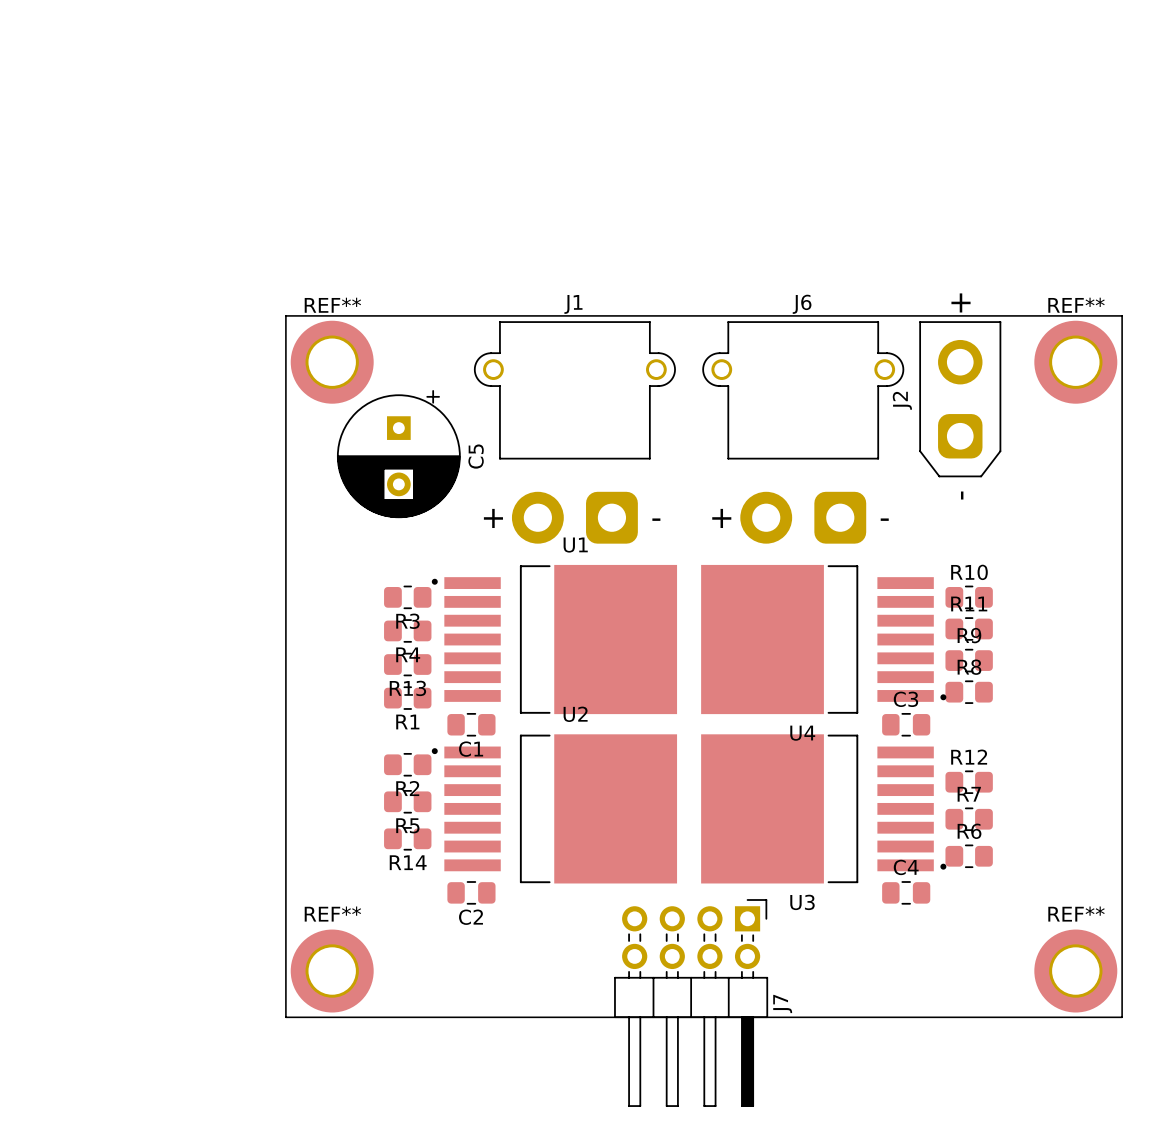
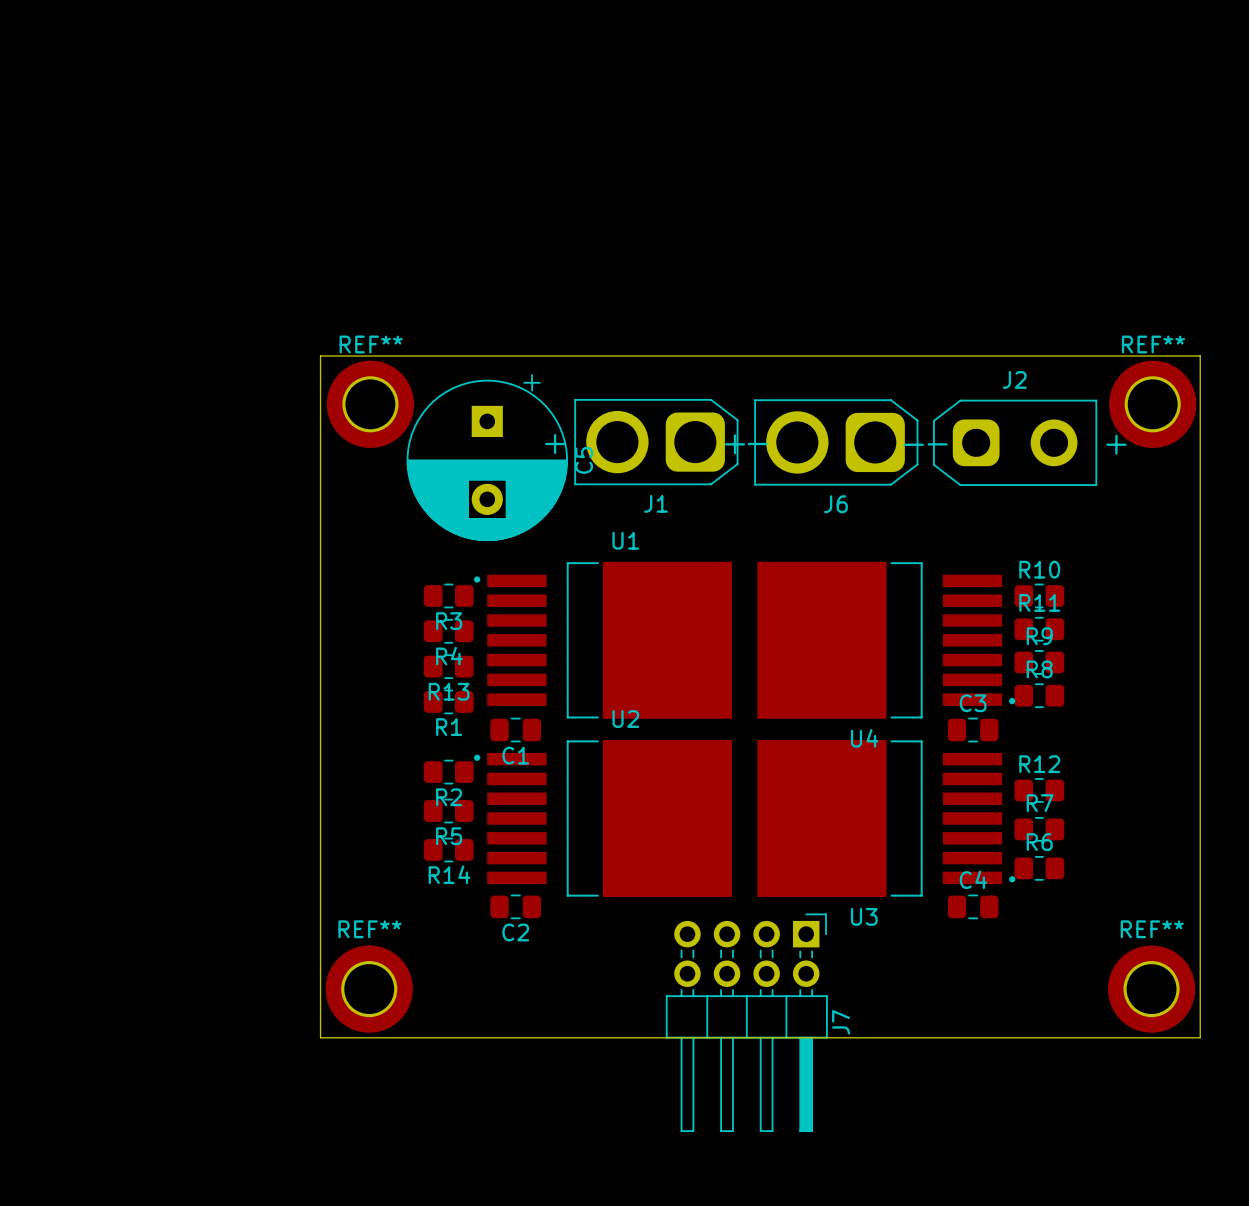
J1 name position: J1 (573, 304) -> J1 (656, 503)
J6 name position: J6 (802, 304) -> J6 (835, 504)
J1 footprint: [473, 321, 676, 544] -> [574, 398, 739, 486]
J6 footprint: [702, 321, 905, 544] -> [754, 399, 919, 486]
REF** position: (332, 362) -> (370, 404)
REF** position: (1075, 362) -> (1152, 404)
board edge: (285, 369) (285, 315) (1122, 315) (1122, 369) -> (320, 355) (1200, 355)
C5 footprint: [336, 390, 461, 519] -> [406, 374, 569, 542]
J2 rotation: 0° (960, 399) -> 90° clockwise (1015, 442)

